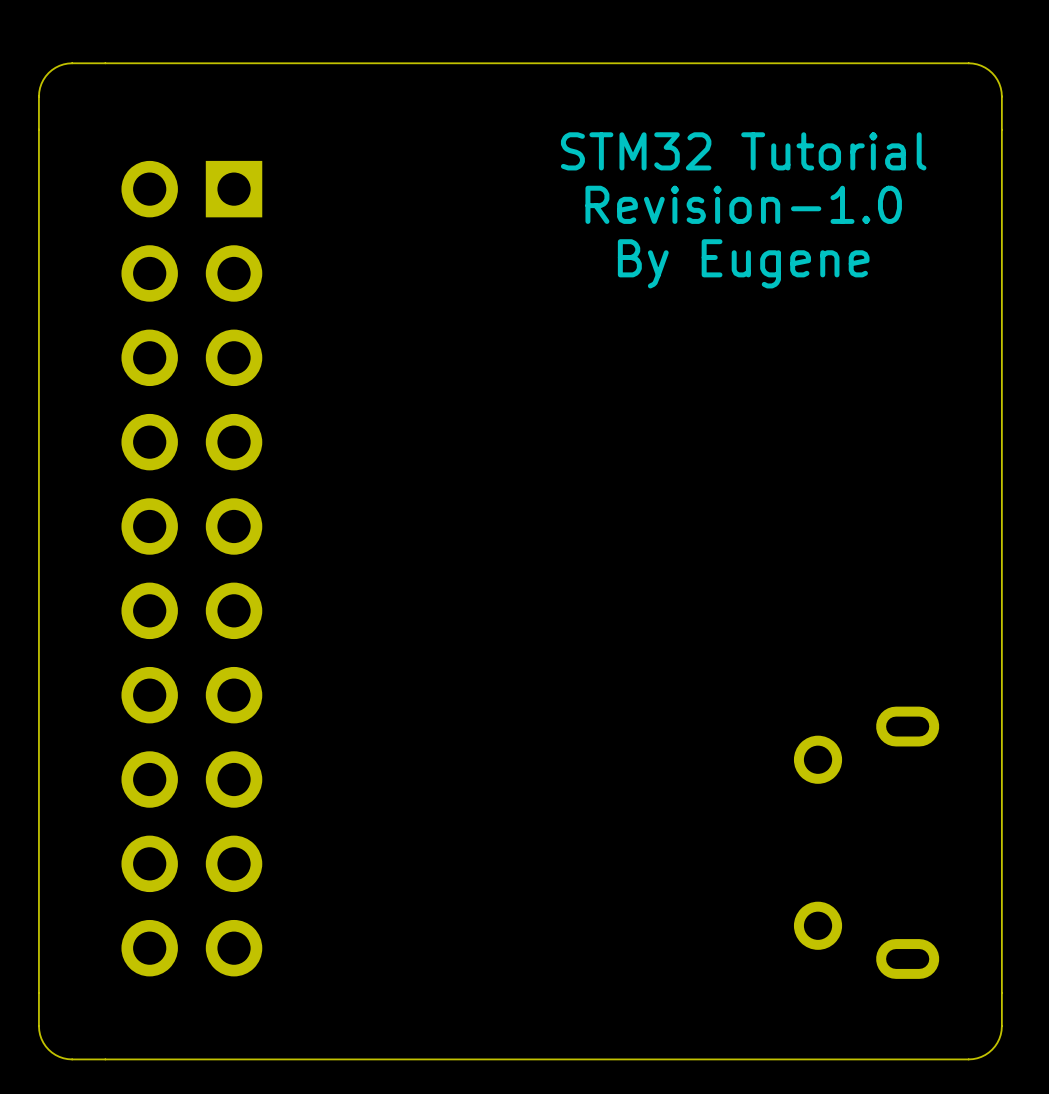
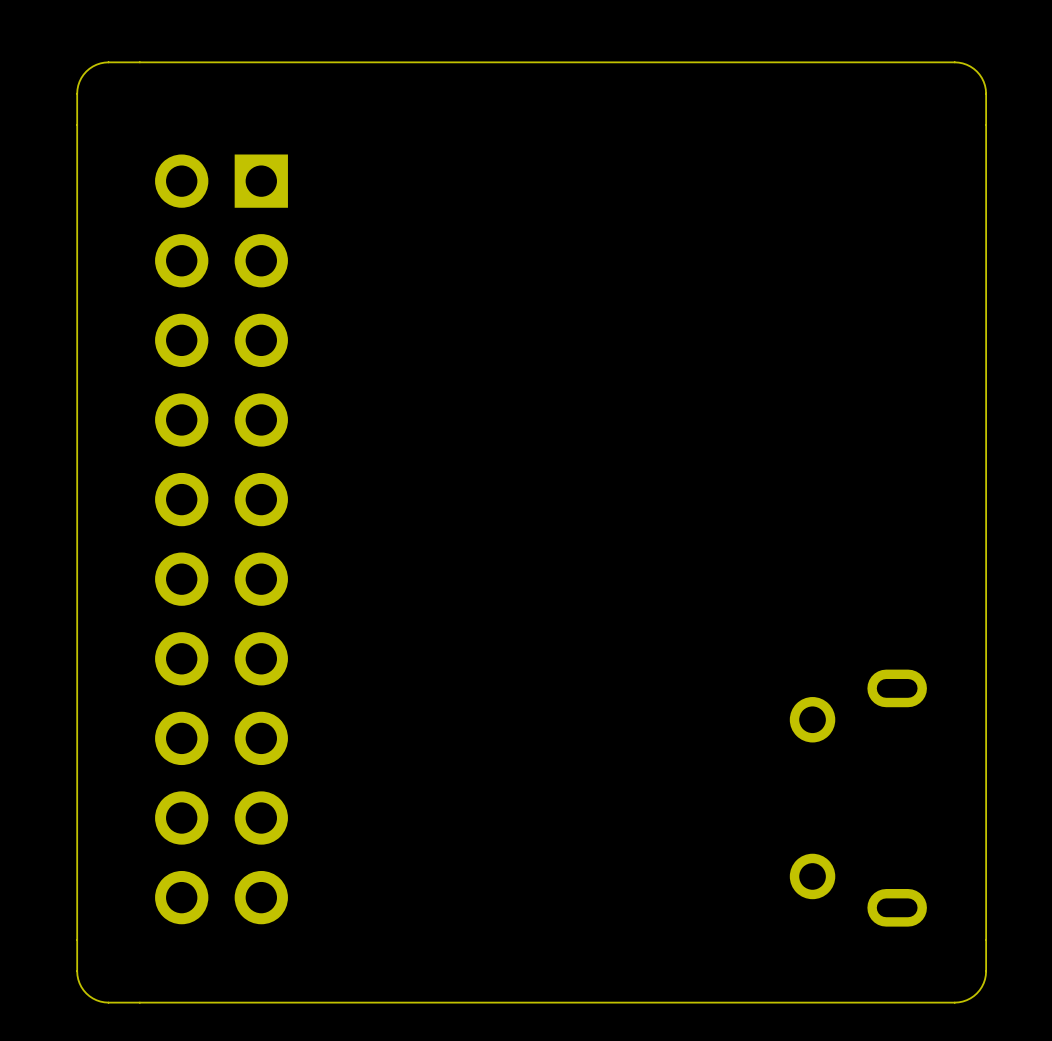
text: STM32 Tutorial (743, 151) -> none
text: Revision-1.0 (743, 204) -> none
text: By Eugene (743, 263) -> none

